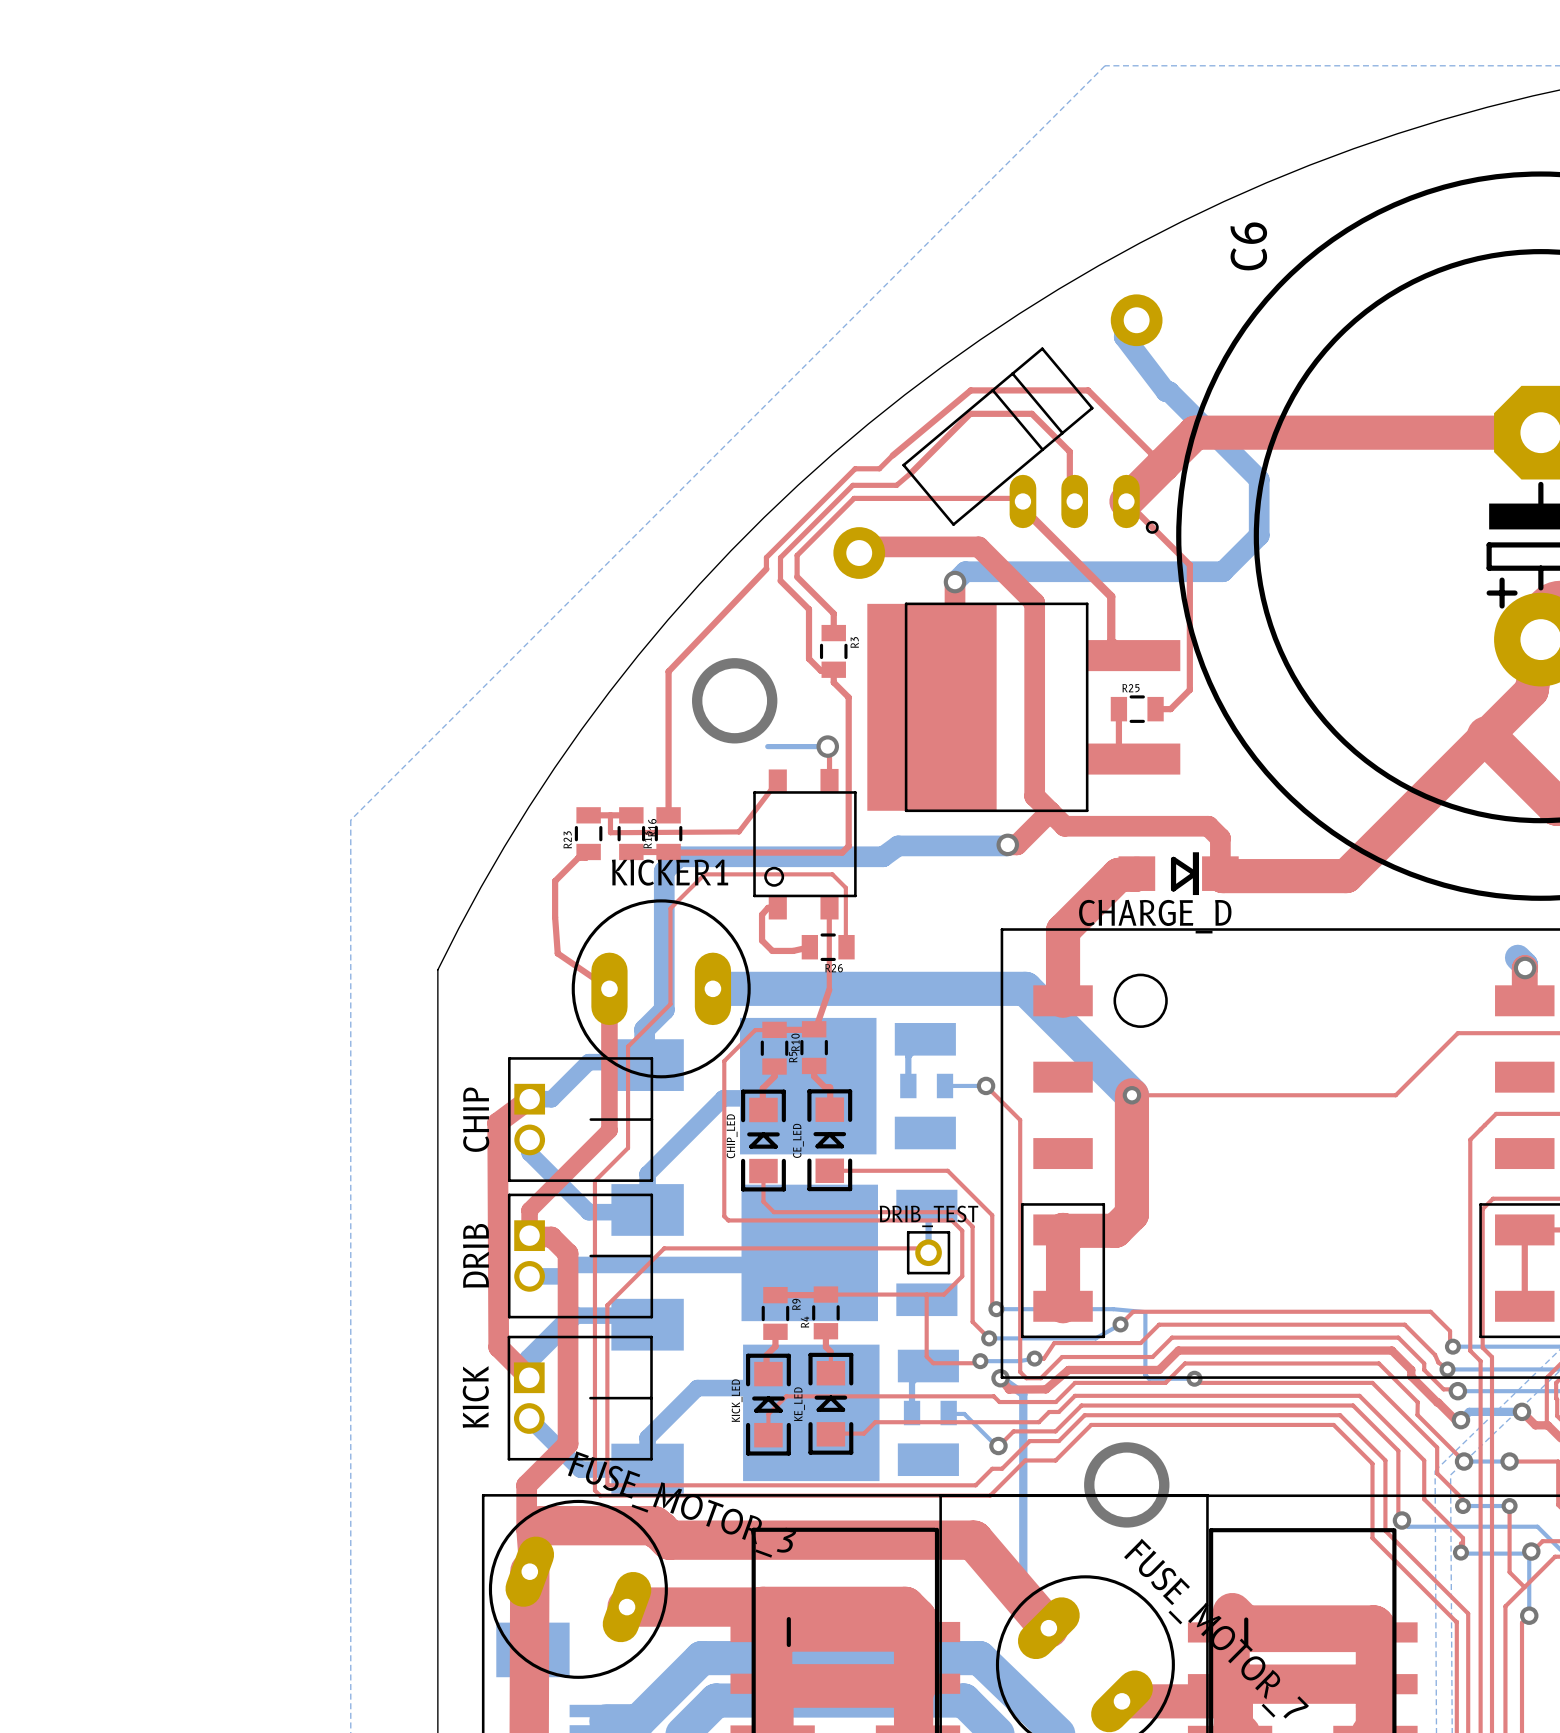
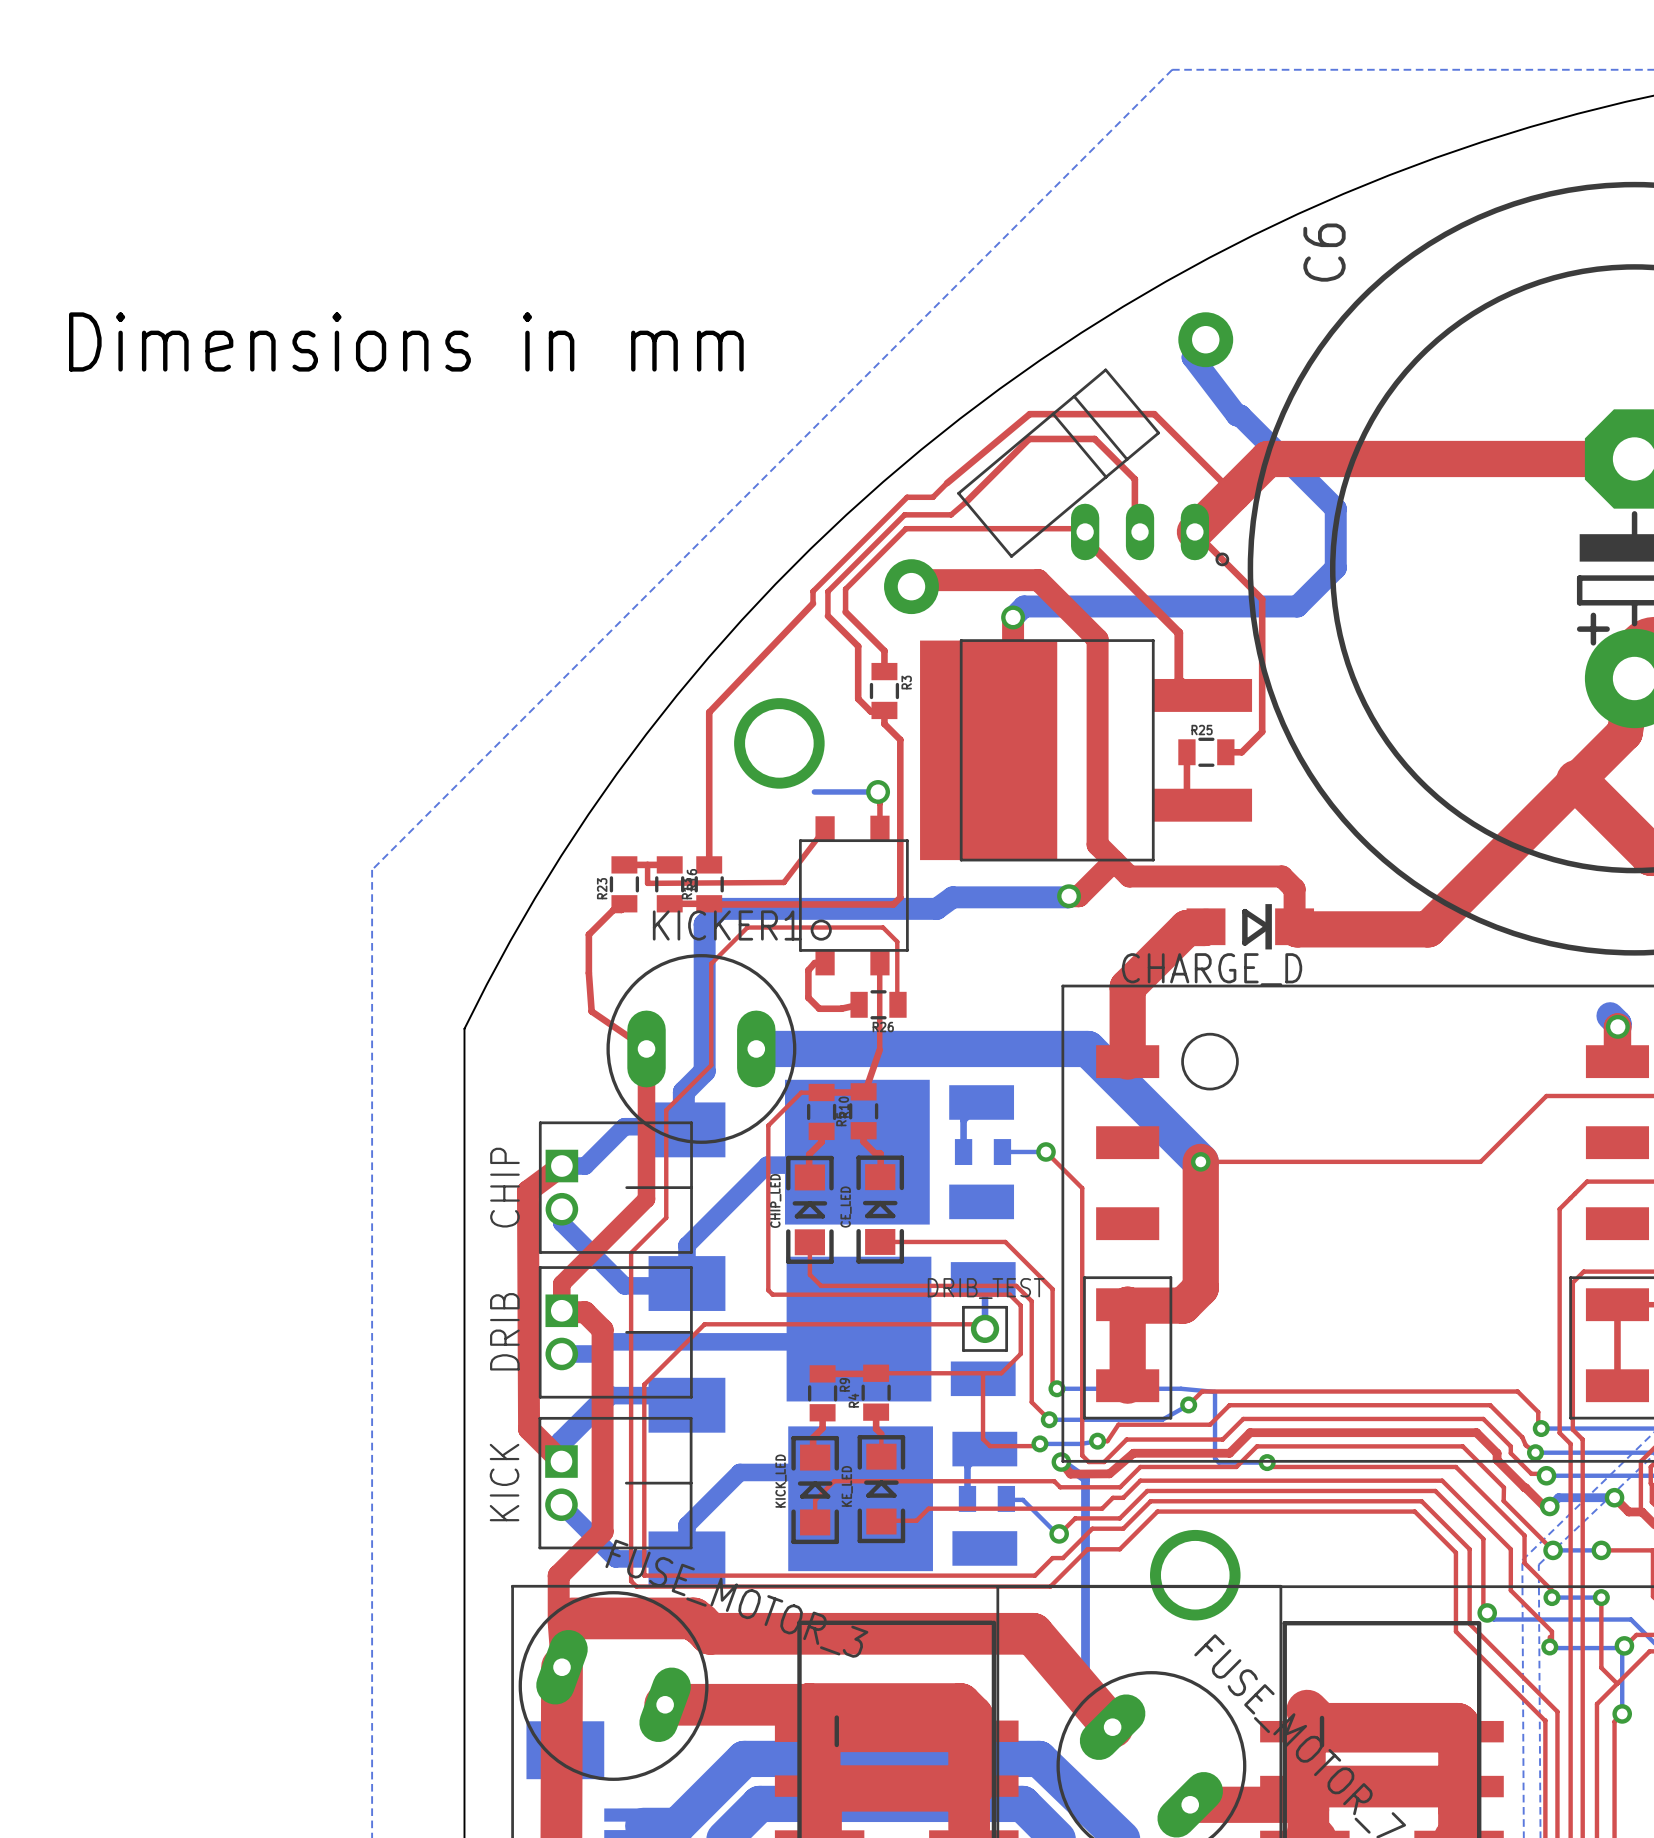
text: none -> Dimensions in mm (406, 341)

